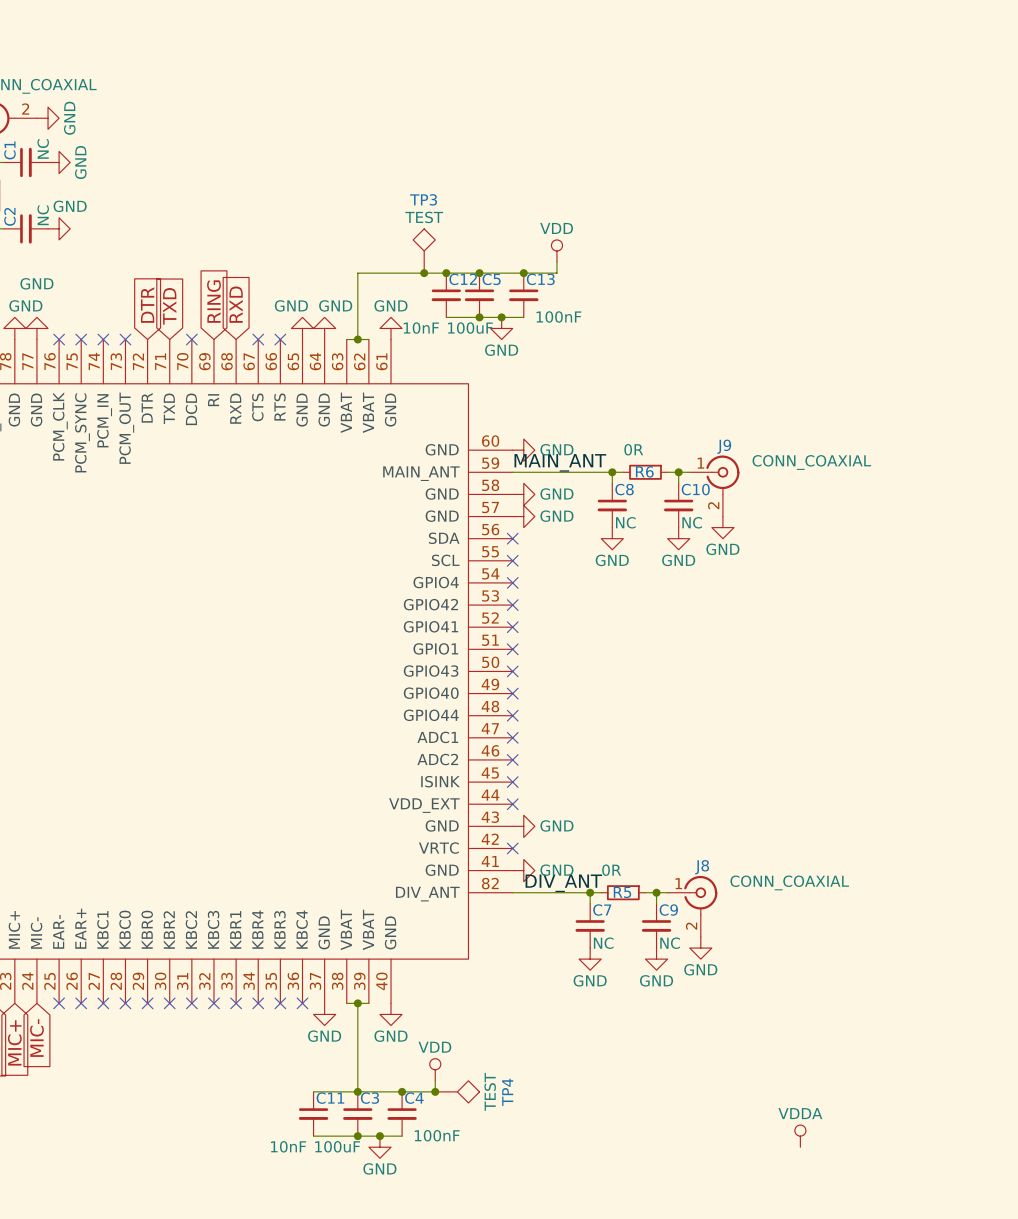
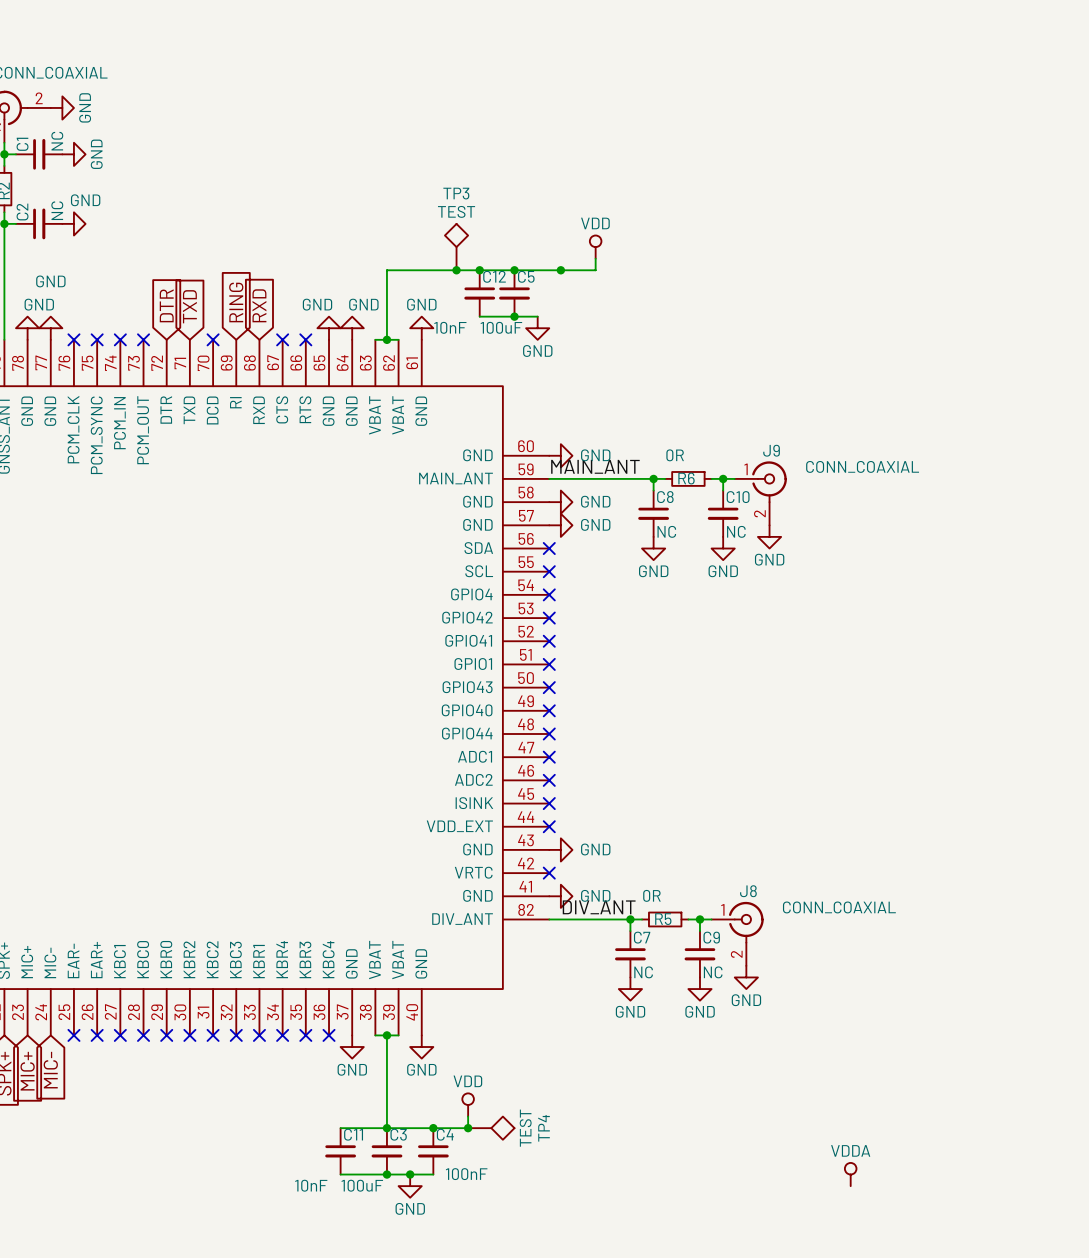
C13: 100nF (523, 295) -> none
wire: (501, 317) (523, 317) -> none
junction: (501, 317) -> none

